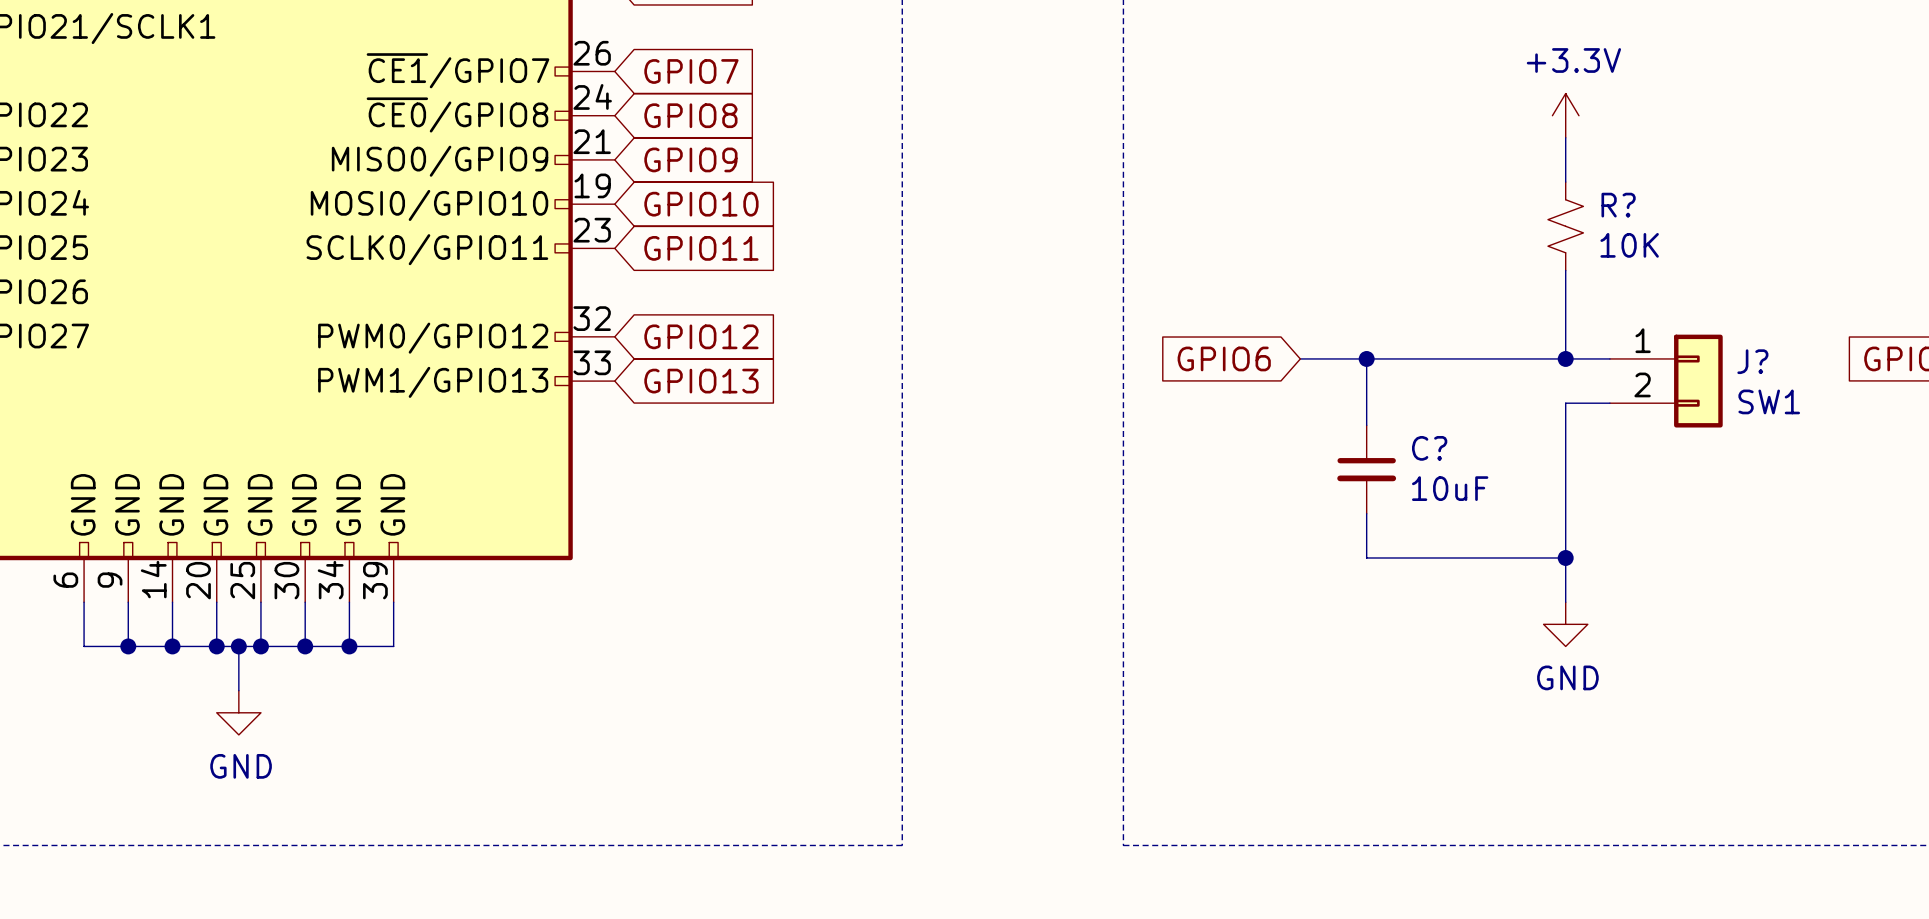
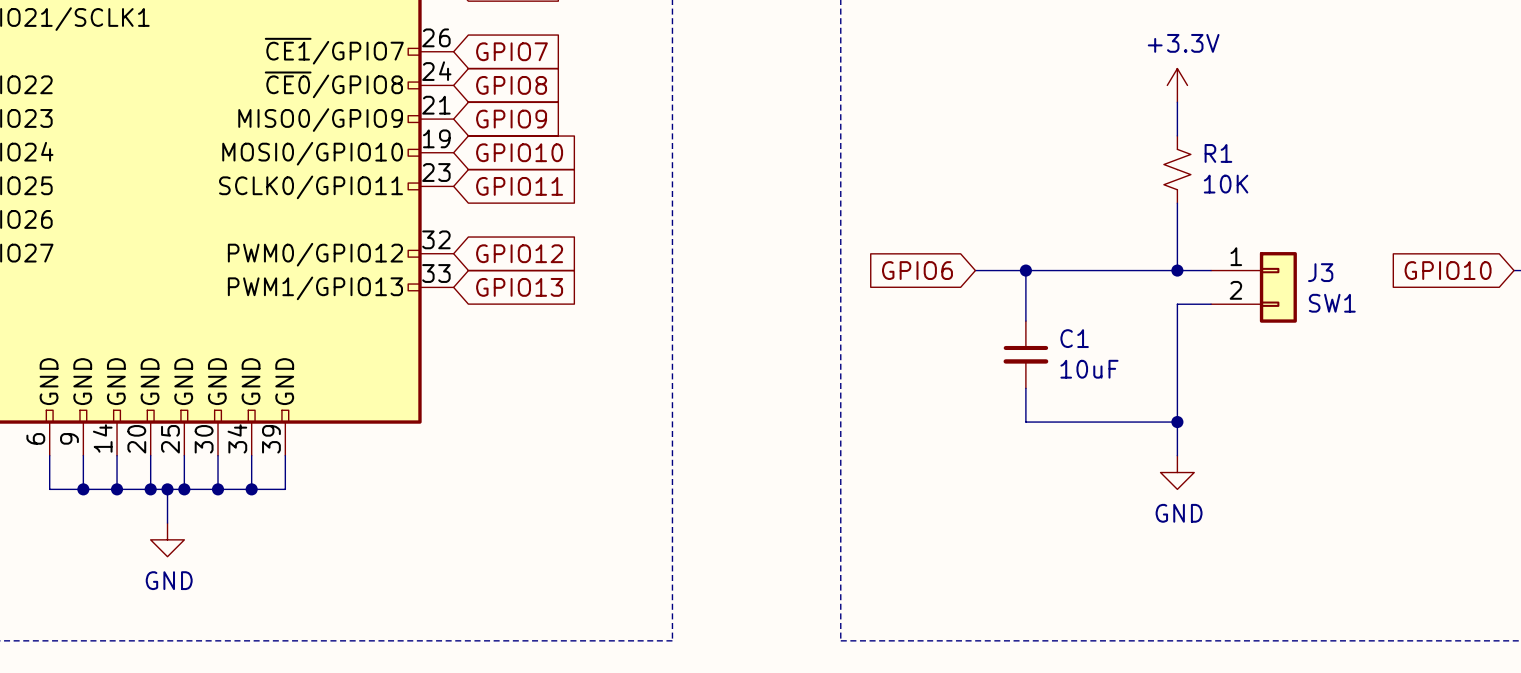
R? name: R? (1618, 205) -> R1 (1218, 153)
J? name: J? (1752, 361) -> J3 (1320, 272)
C? name: C? (1429, 448) -> C1 (1074, 338)

